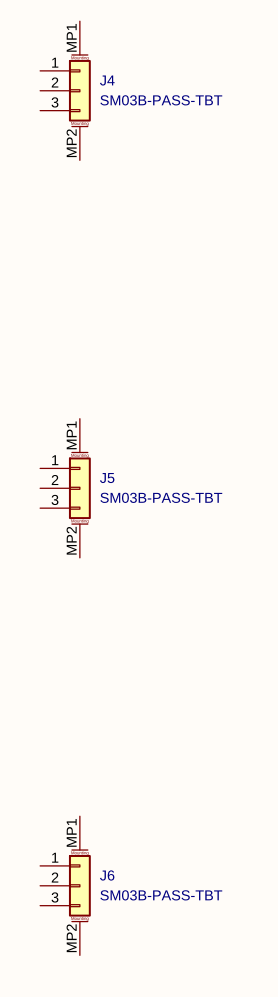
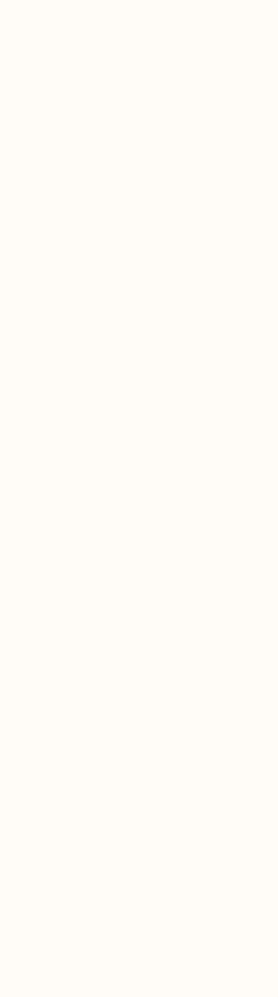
J4: SM03B-PASS-TBT (65, 90) -> none
J5: SM03B-PASS-TBT (65, 488) -> none
J6: SM03B-PASS-TBT (65, 885) -> none

